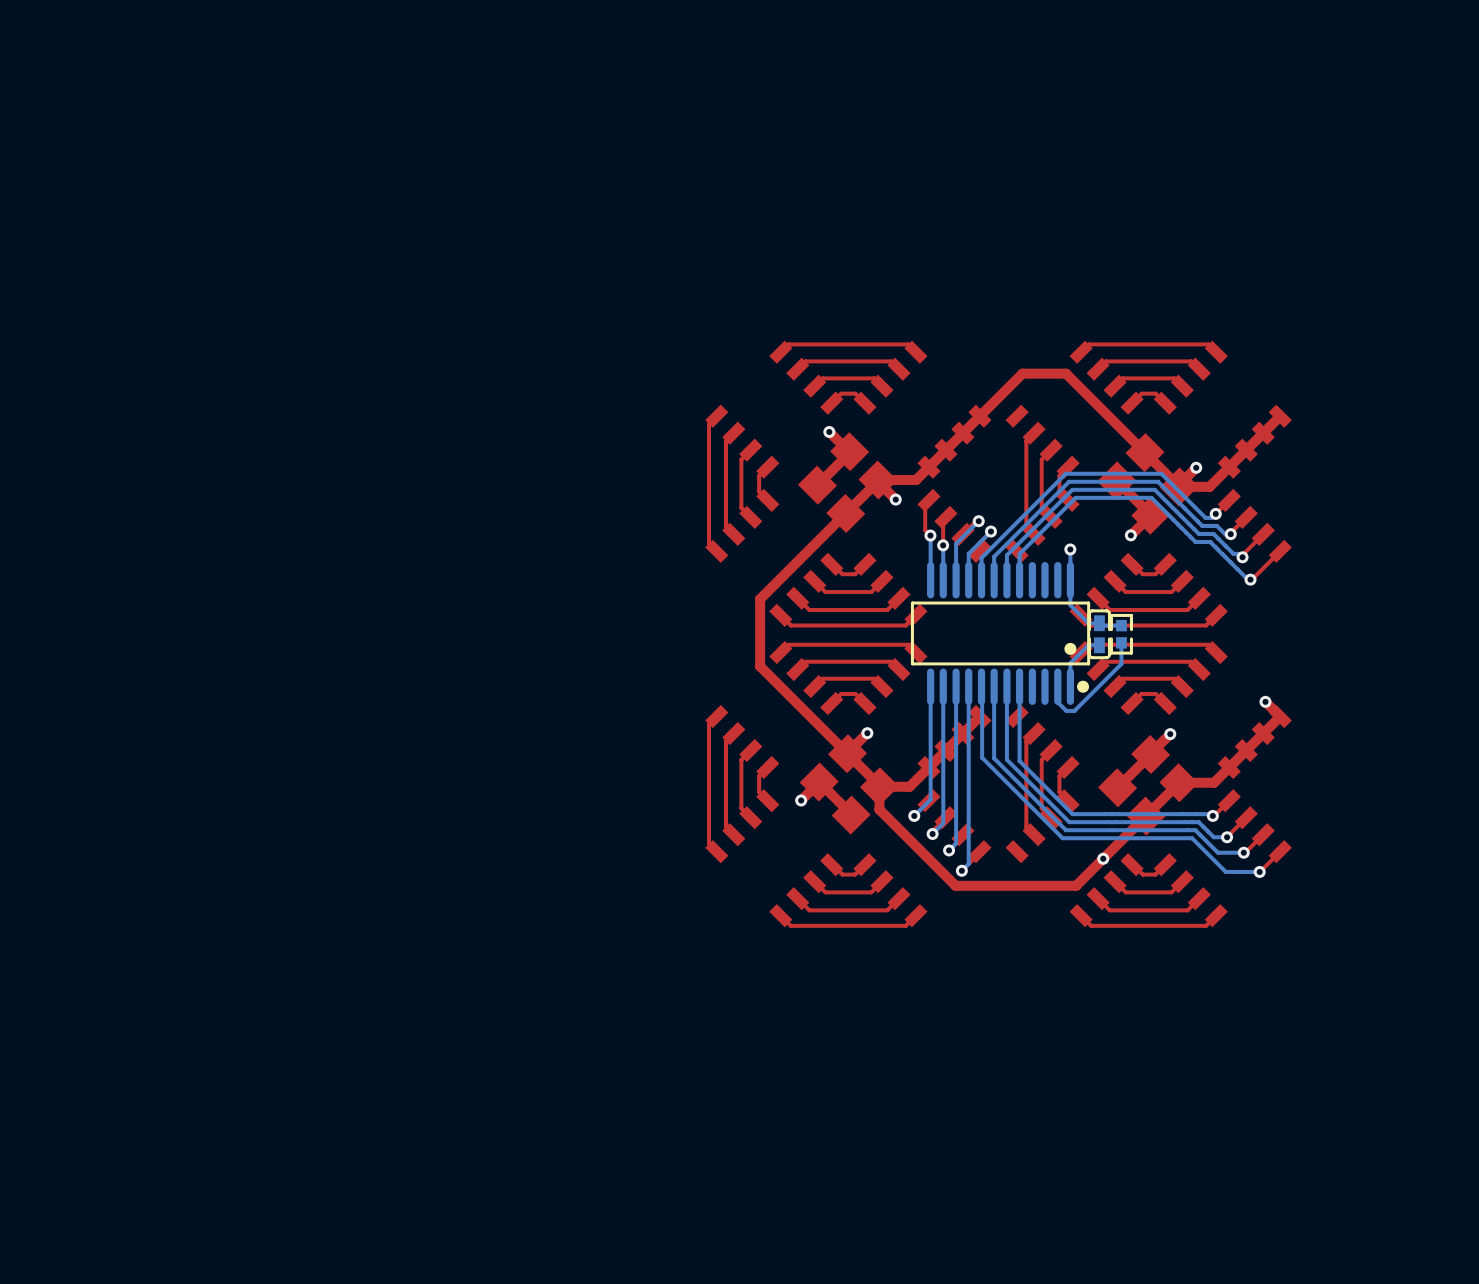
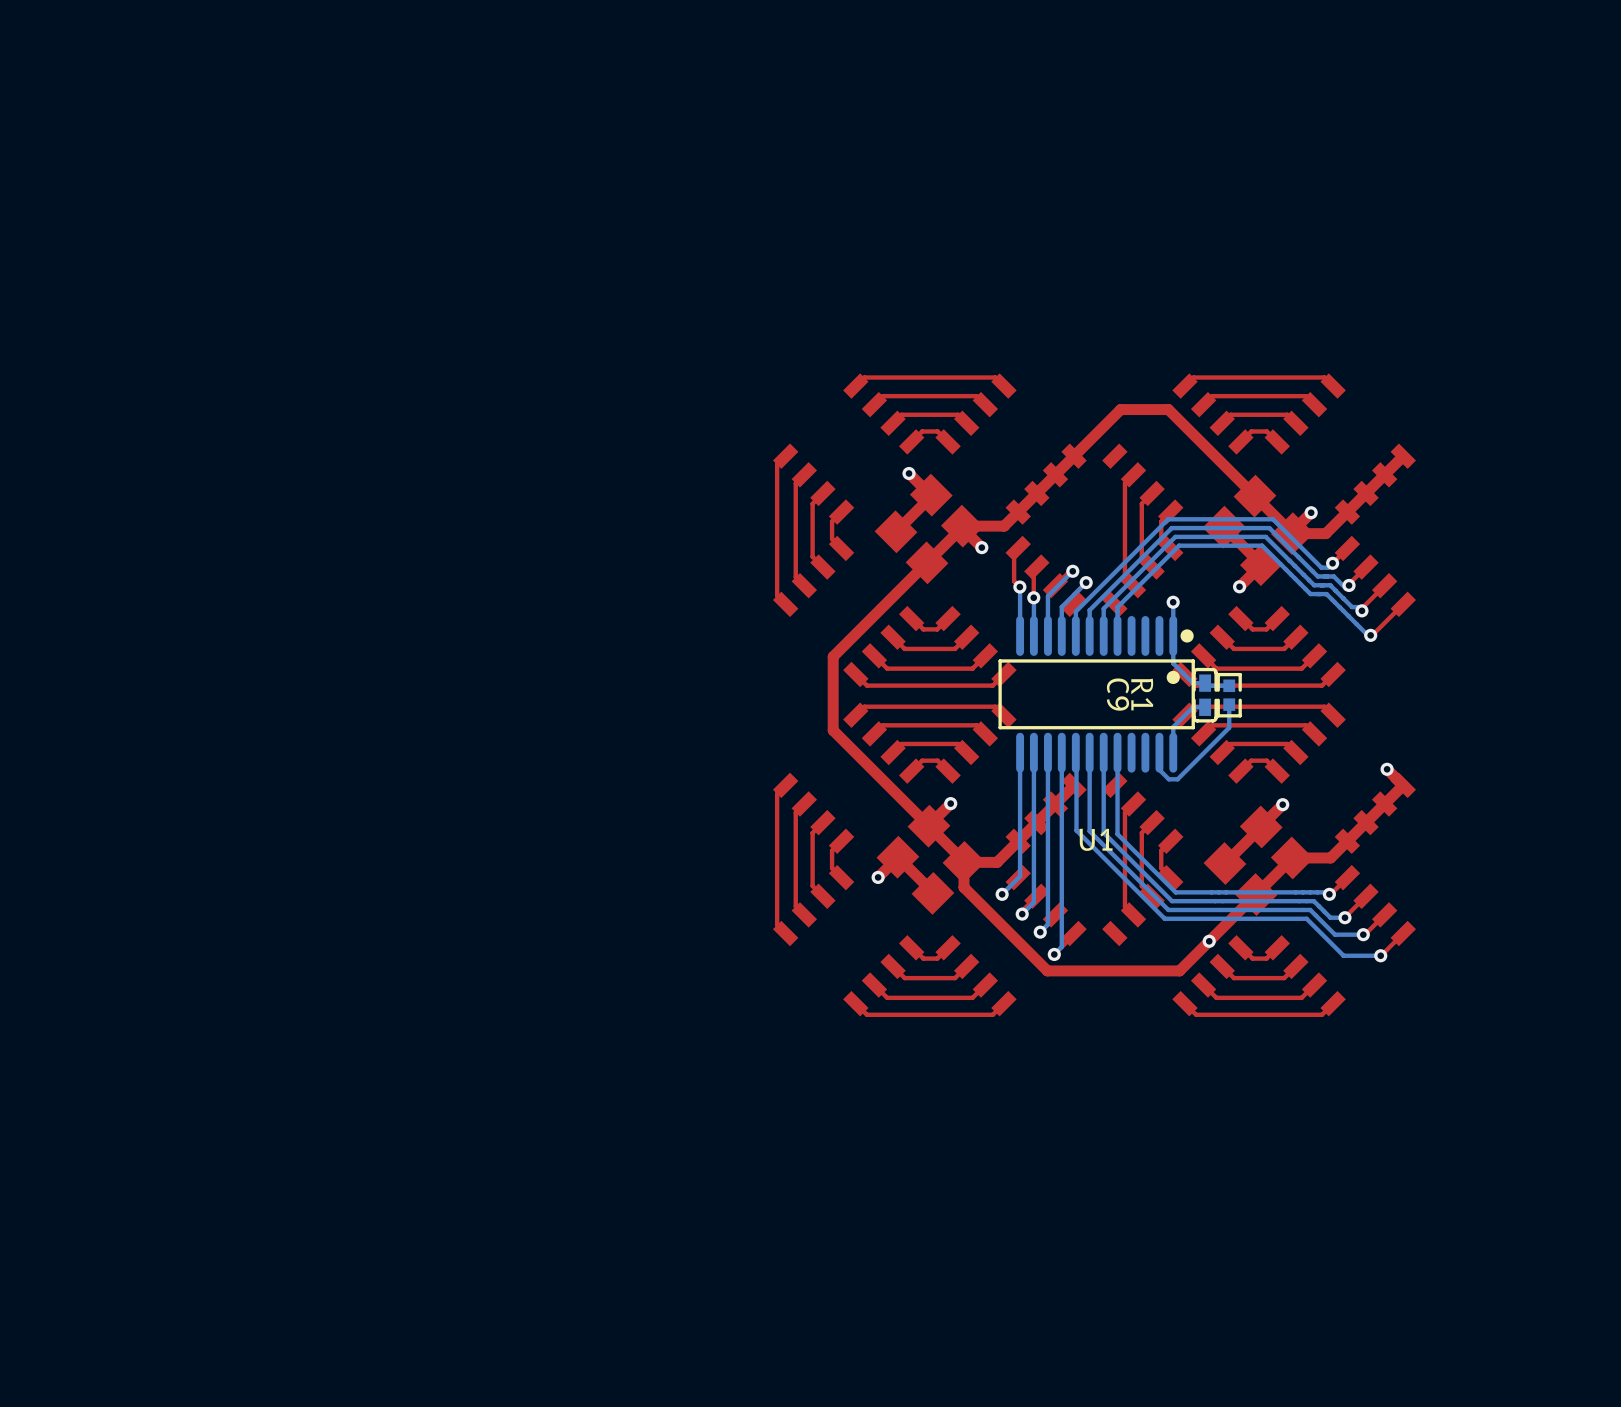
part: (1000, 633) -> none
U1: none -> (1096, 694)
C9 name: none -> C9 (1117, 694)
R1 name: none -> R1 (1142, 694)

